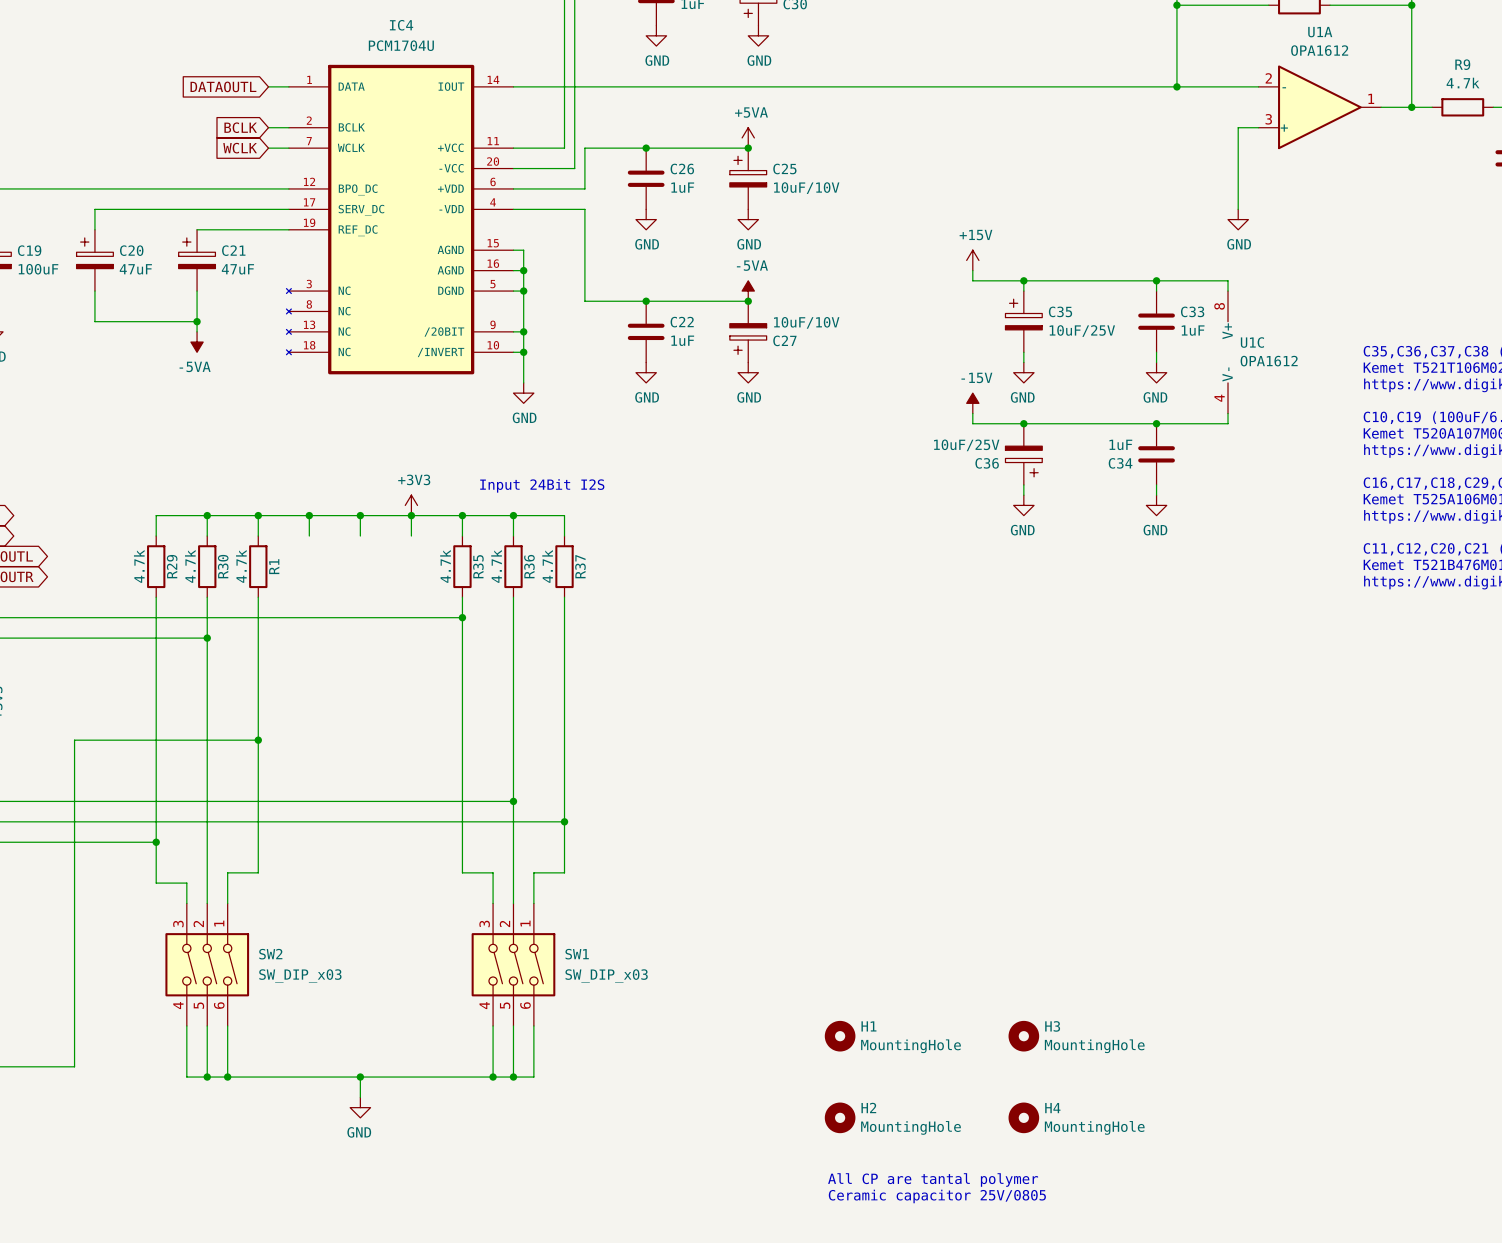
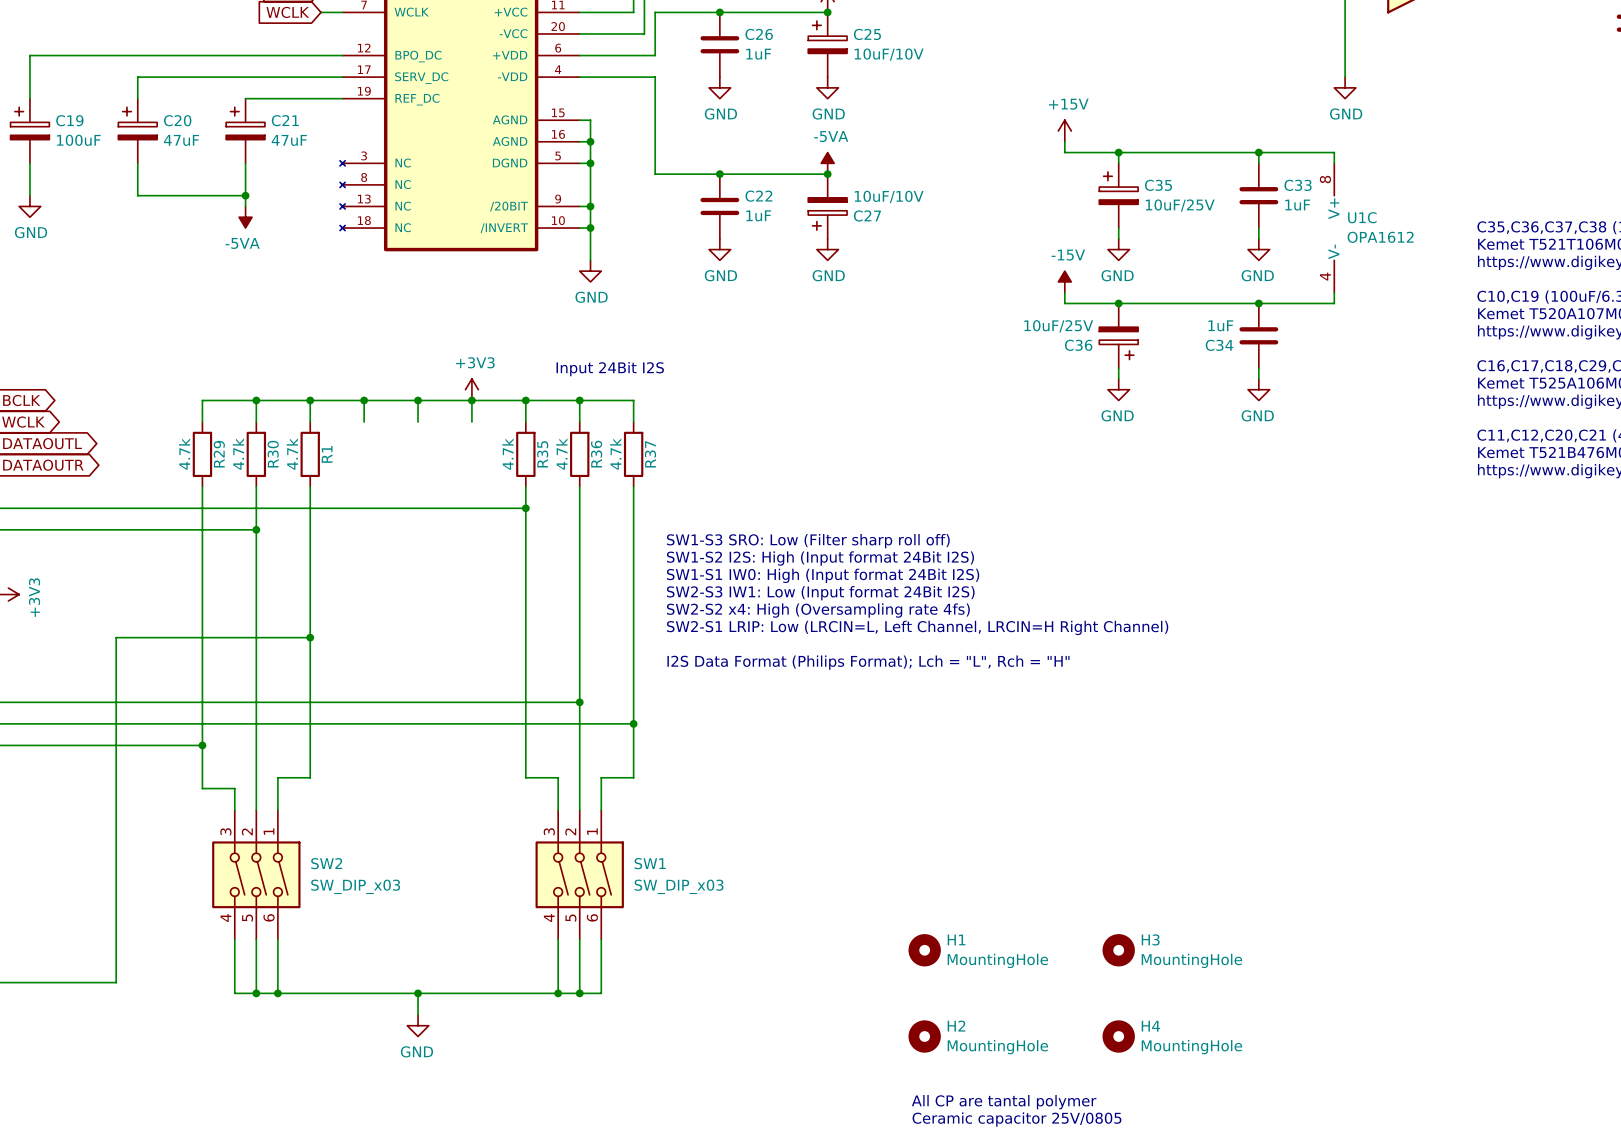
text: none -> SW1-S3 SRO: Low (Filter sharp roll off) (808, 541)
text: none -> SW1-S2 I2S: High (Input format 24Bit I2S) (820, 558)
text: none -> SW1-S1 IW0: High (Input format 24Bit I2S) (823, 575)
text: none -> SW2-S3 IW1: Low (Input format 24Bit I2S) (820, 593)
text: none -> SW2-S2 x4: High (Oversampling rate 4fs) (818, 610)
text: none -> SW2-S1 LRIP: Low (LRCIN=L, Left Channel, LRCIN=H Right Channel) (917, 627)
text: none -> I2S Data Format (Philips Format); Lch = "L", Rch = "H" (868, 662)

